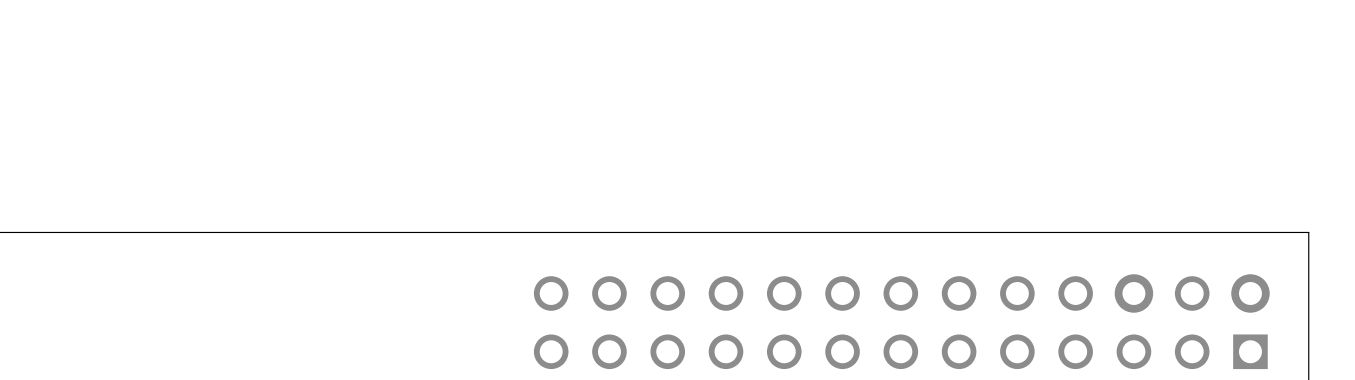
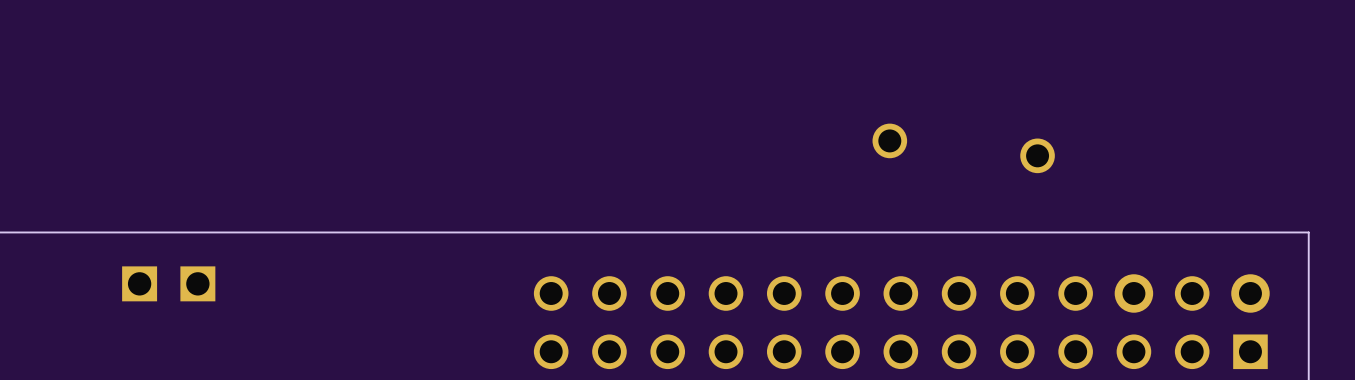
part: none -> (889, 140)
part: none -> (1037, 155)
part: none -> (168, 283)

